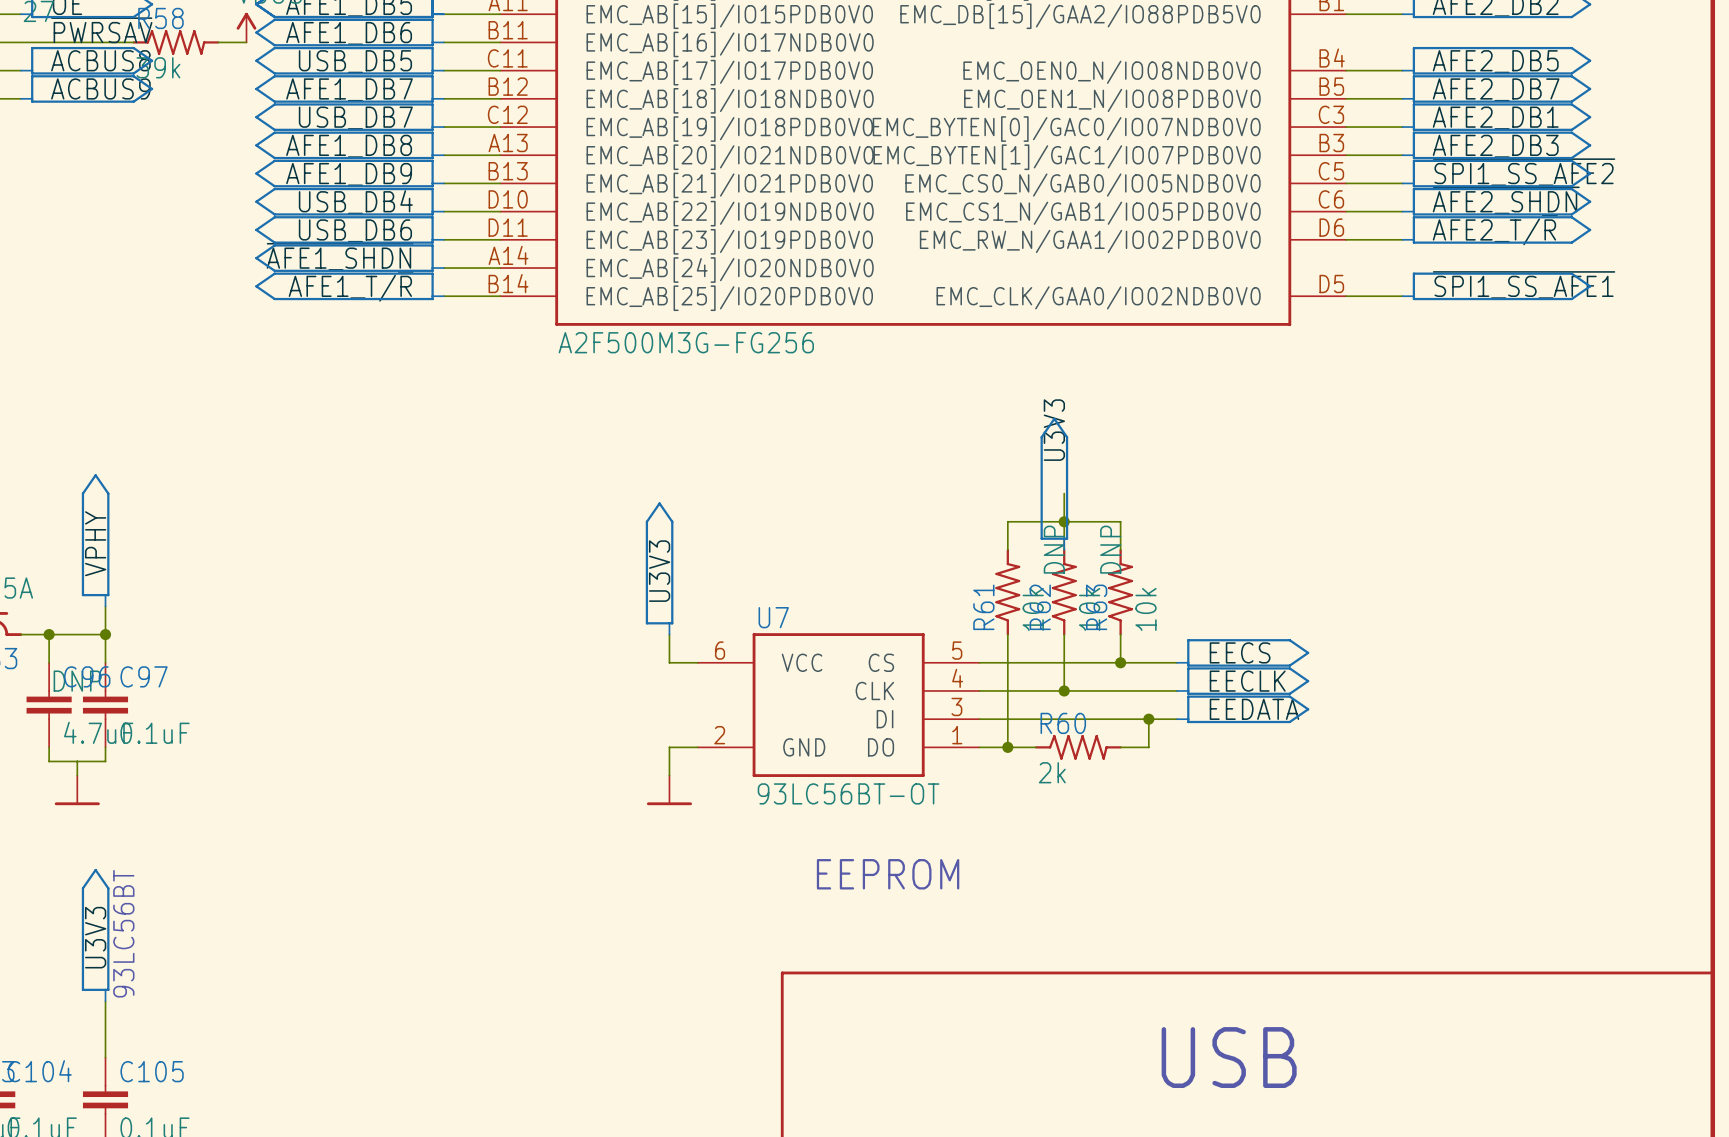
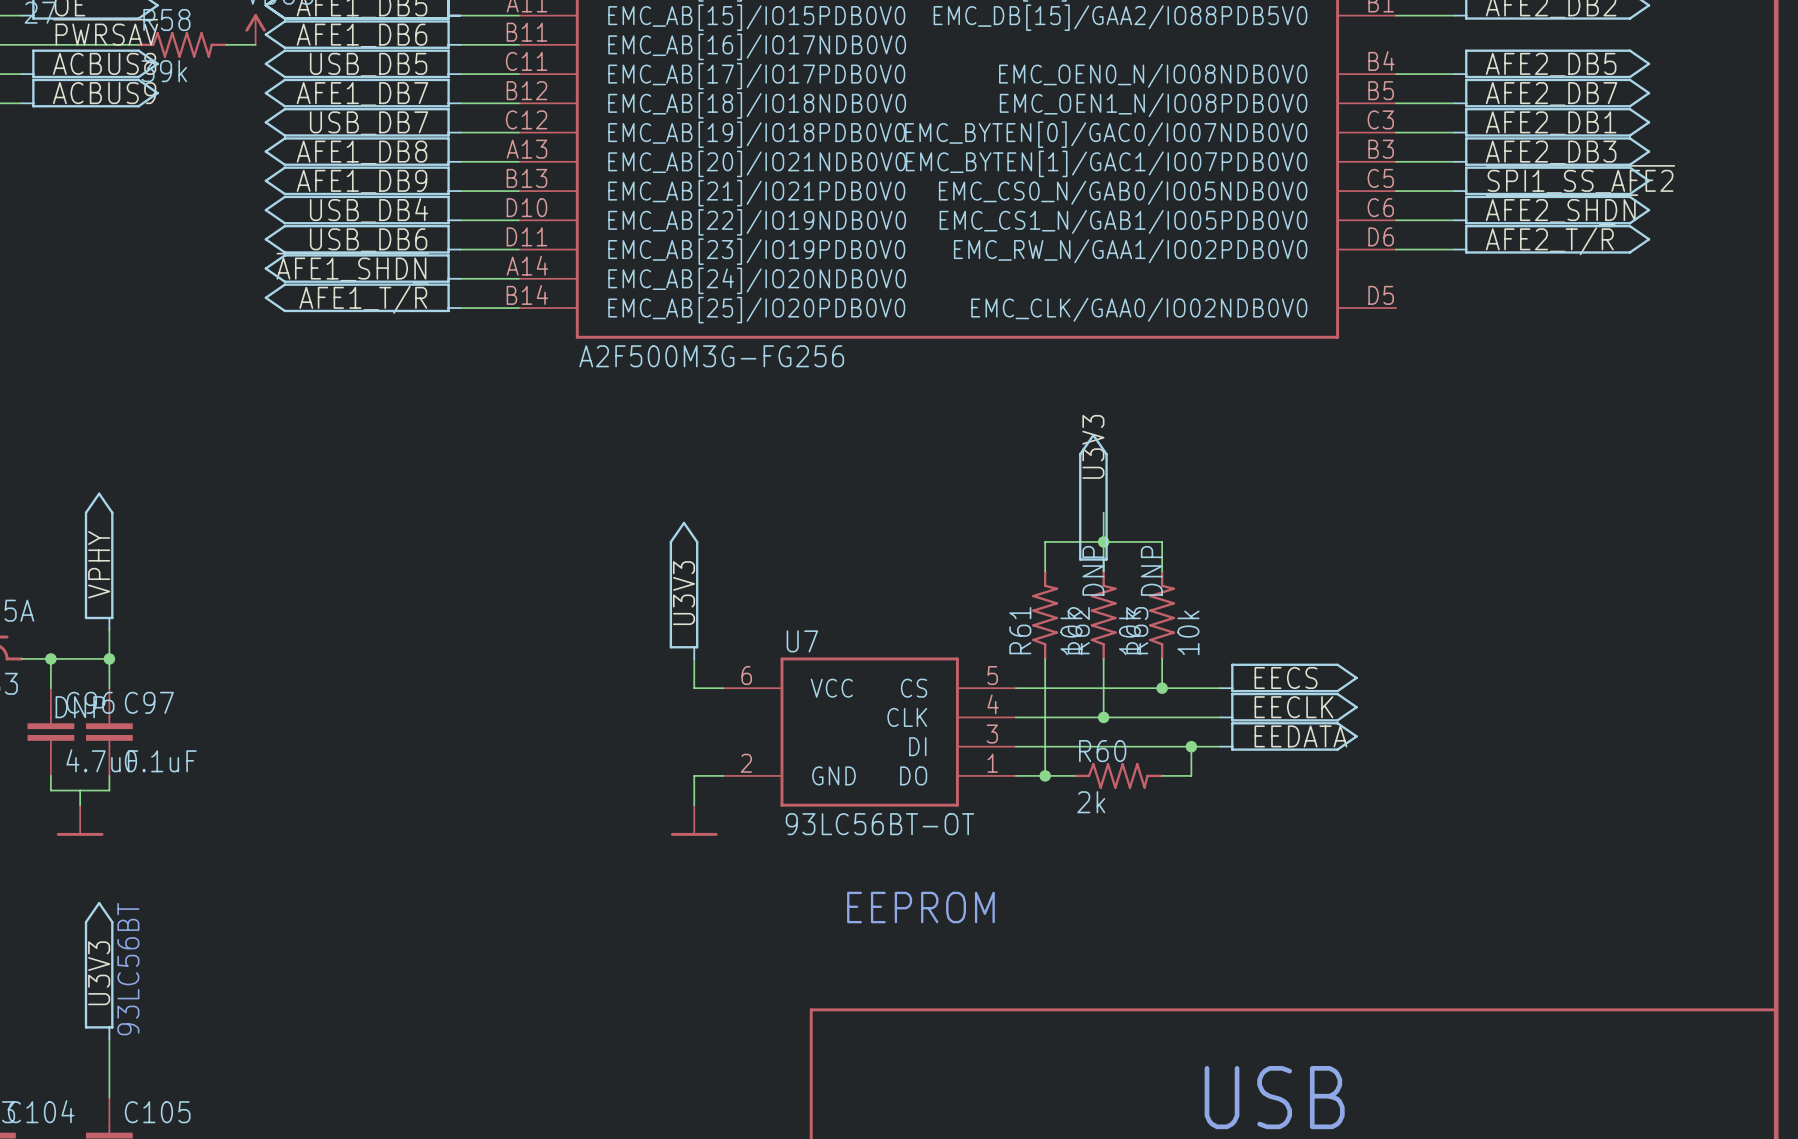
label: ~{SPI1_SS_AFE1} (1524, 285) -> none
part: (1496, 286) -> none
wire: (1346, 296) (1402, 296) -> none

